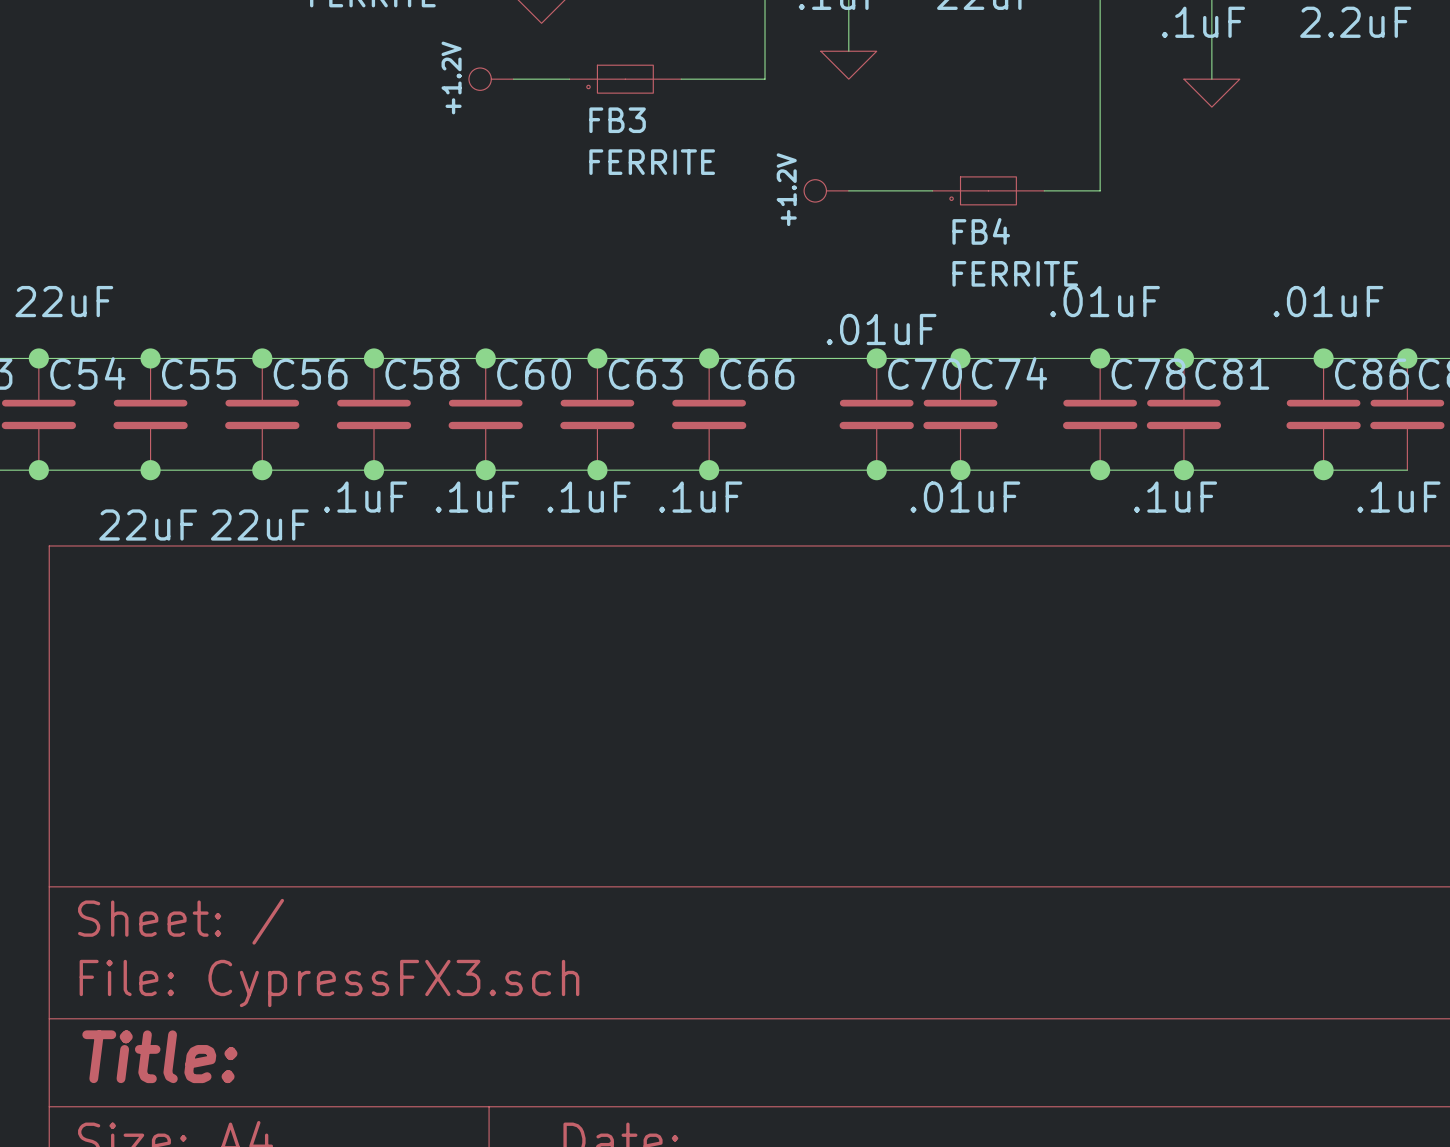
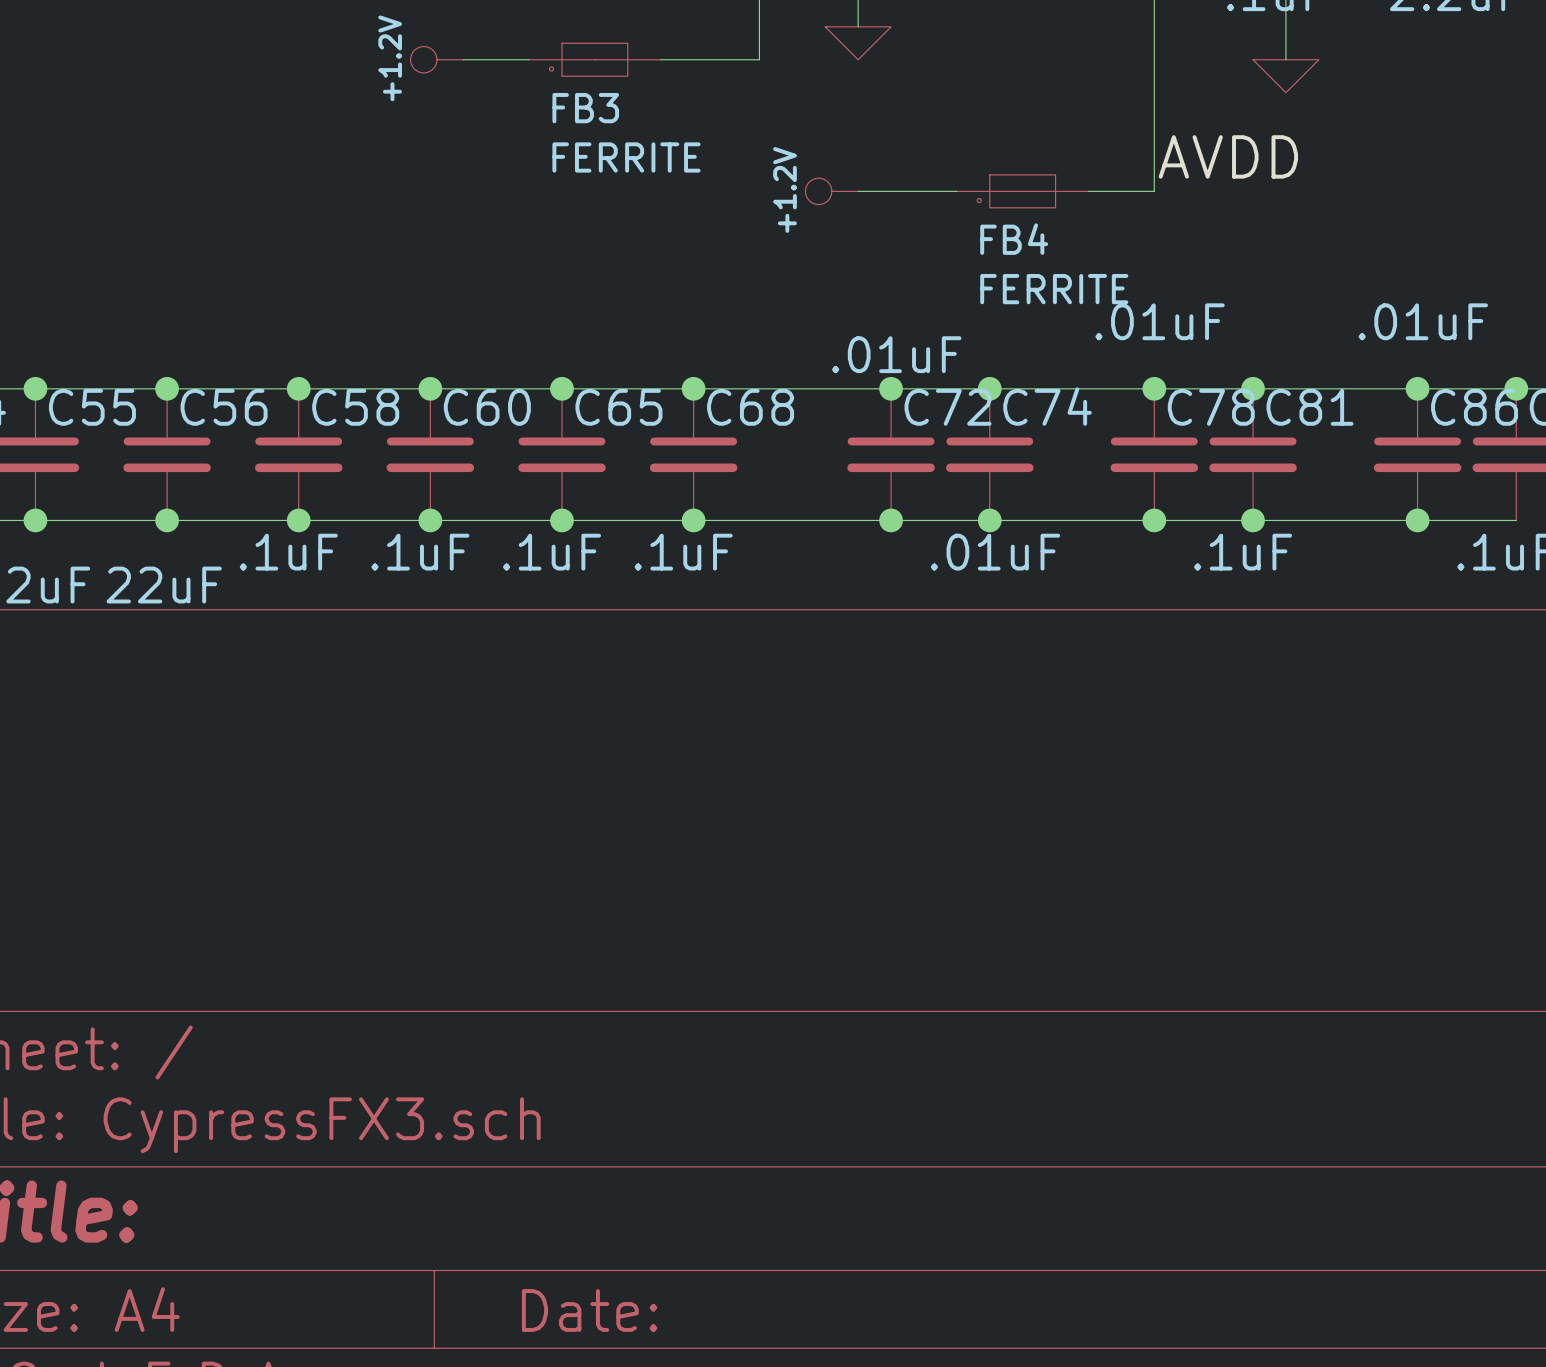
label: none -> AVDD (1228, 156)
C63 name: C63 (645, 374) -> C65 (618, 407)
C66 name: C66 (757, 374) -> C68 (750, 407)
C70 name: C70 (925, 374) -> C72 (948, 407)

